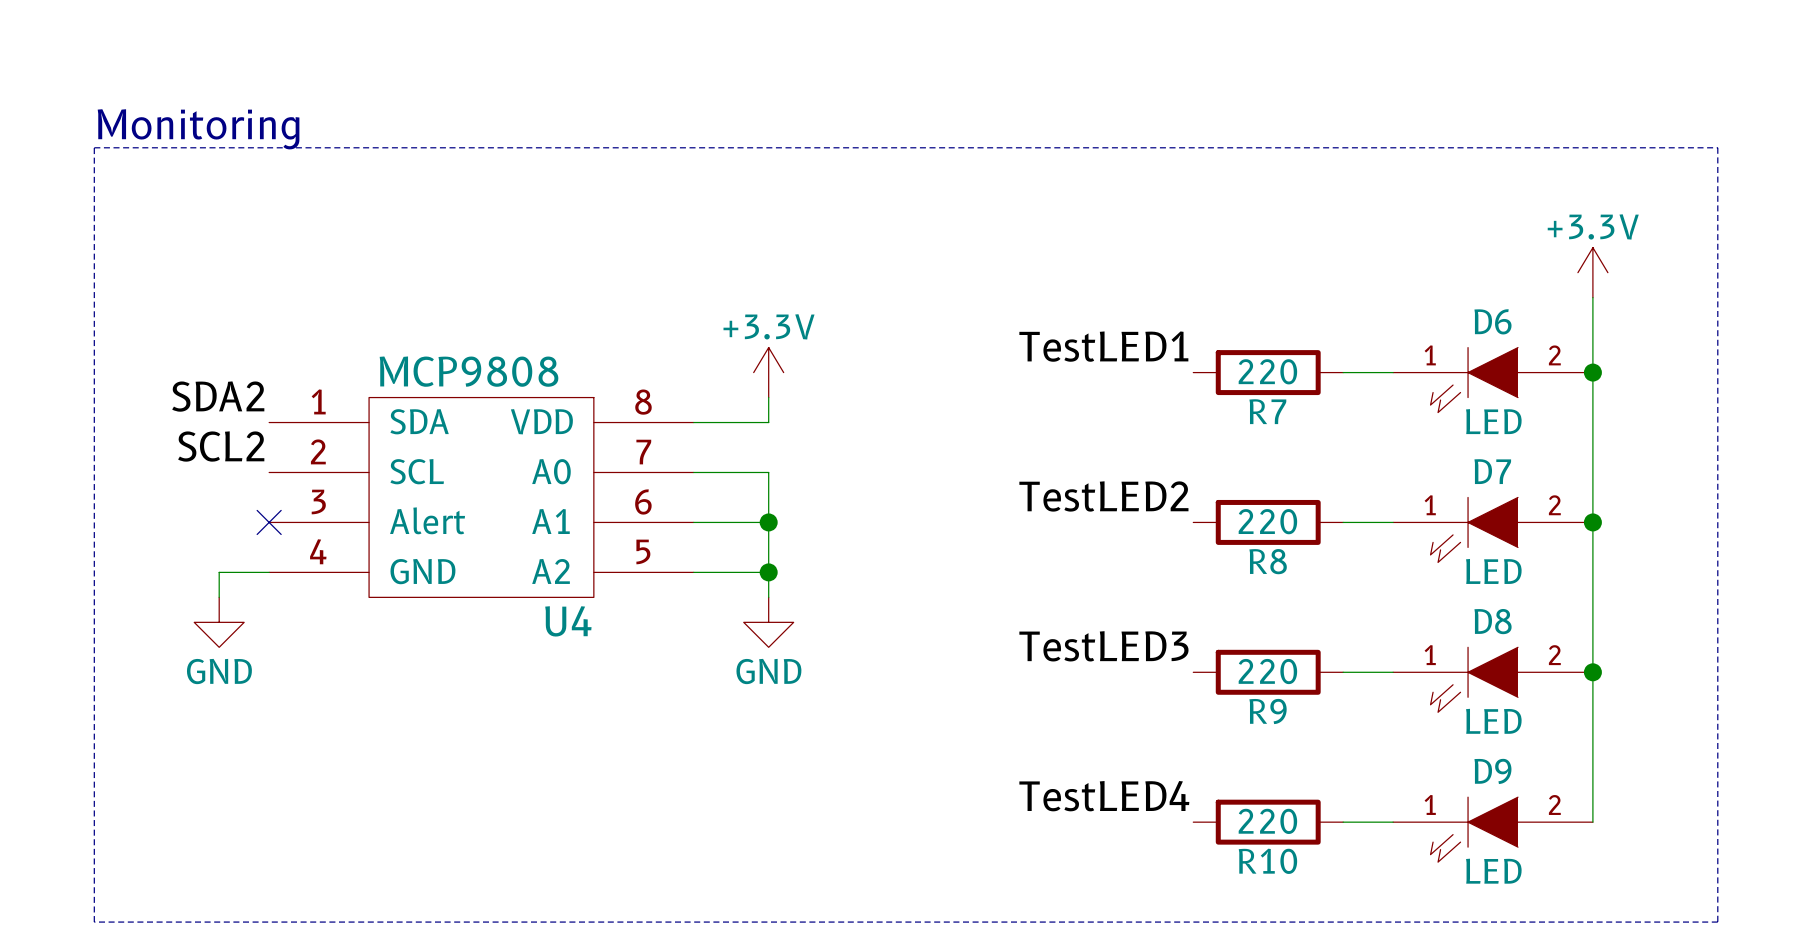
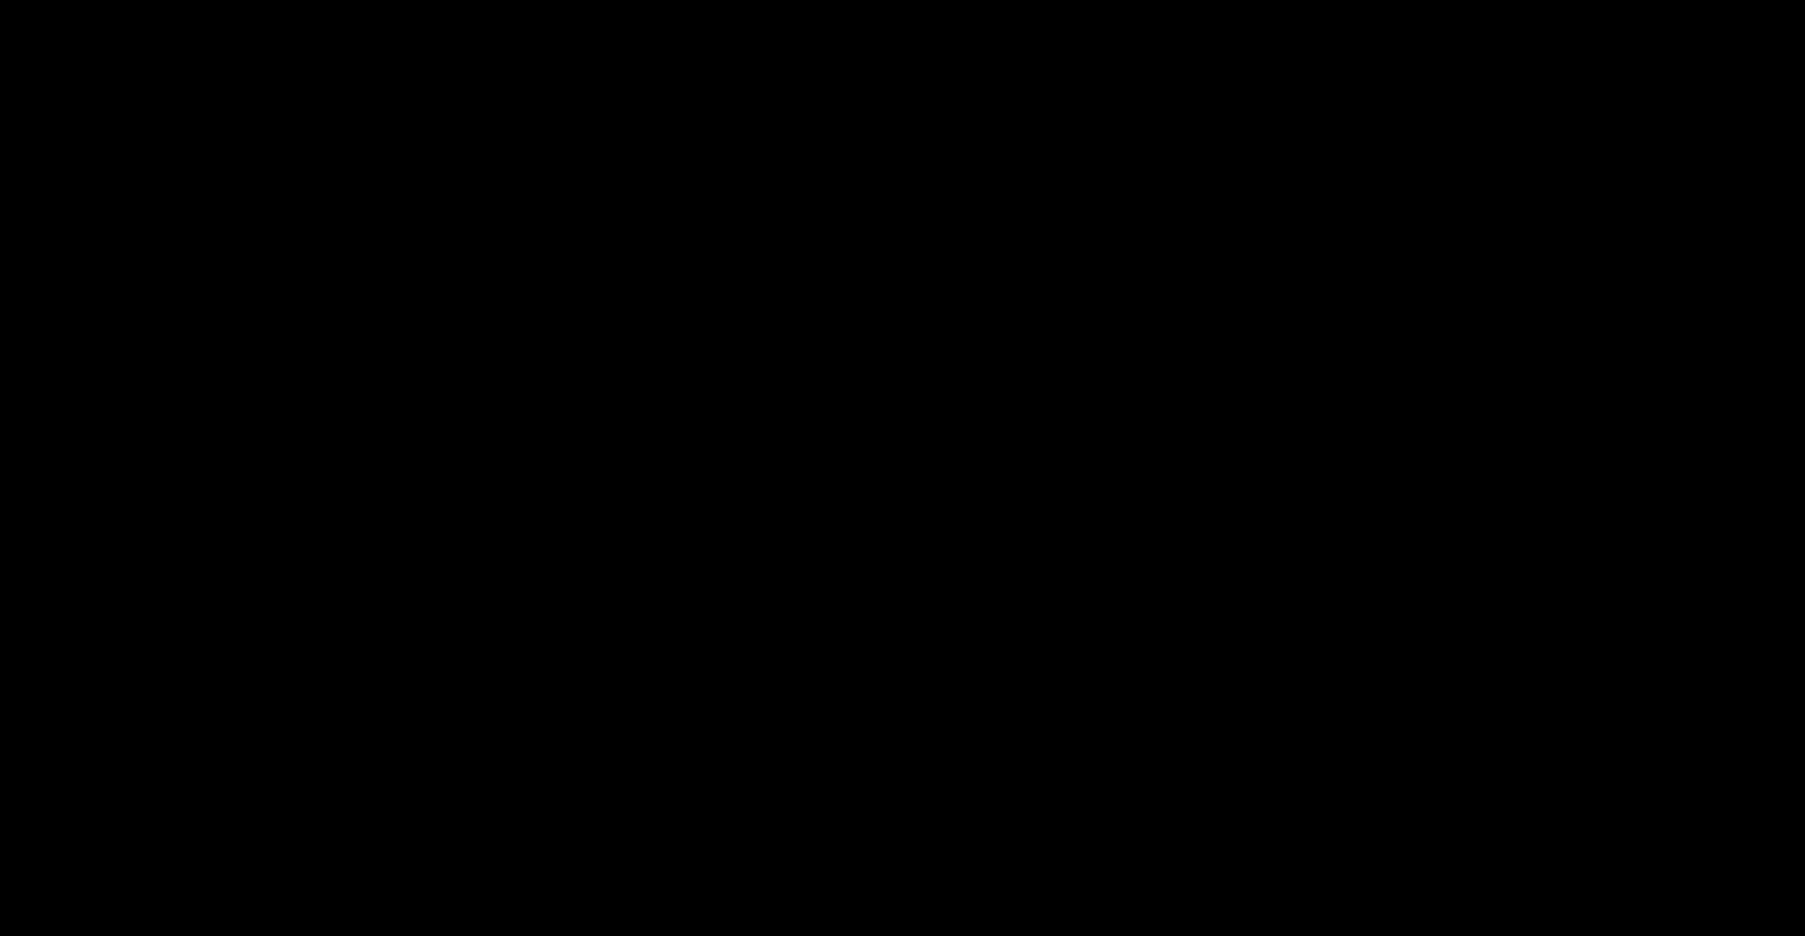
text: Monitoring (198, 129) -> none
line: (94, 147) (1717, 147) (1717, 922) (94, 922) (94, 147) -> none
power symbol: +3.3V (1592, 272) -> none
wire: (1592, 297) (1592, 822) -> none
label: TestLED1 (1103, 346) -> none
power symbol: +3.3V (768, 372) -> none
R7: 220 (1268, 372) -> none
wire: (1343, 372) (1393, 372) -> none
junction: (1592, 372) -> none
D6: LED (1493, 380) -> none
label: SDA2 (218, 396) -> none
wire: (768, 397) (768, 422) (693, 422) -> none
label: SCL2 (221, 446) -> none
wire: (693, 472) (768, 472) (768, 597) -> none
label: TestLED2 (1103, 496) -> none
U4: MCP9808 (481, 497) -> none
no-connect mark: (269, 522) -> none
wire: (693, 522) (768, 522) -> none
junction: (768, 522) -> none
R8: 220 (1268, 522) -> none
wire: (1343, 522) (1393, 522) -> none
junction: (1592, 522) -> none
D7: LED (1493, 529) -> none
wire: (269, 572) (219, 572) (219, 597) -> none
wire: (693, 572) (768, 572) -> none
junction: (768, 572) -> none
power symbol: GND (219, 622) -> none
power symbol: GND (768, 622) -> none
label: TestLED3 (1103, 646) -> none
R9: 220 (1268, 672) -> none
wire: (1343, 672) (1393, 672) -> none
junction: (1592, 672) -> none
D8: LED (1493, 679) -> none
label: TestLED4 (1104, 796) -> none
R10: 220 (1268, 822) -> none
wire: (1343, 822) (1393, 822) -> none
D9: LED (1493, 829) -> none

